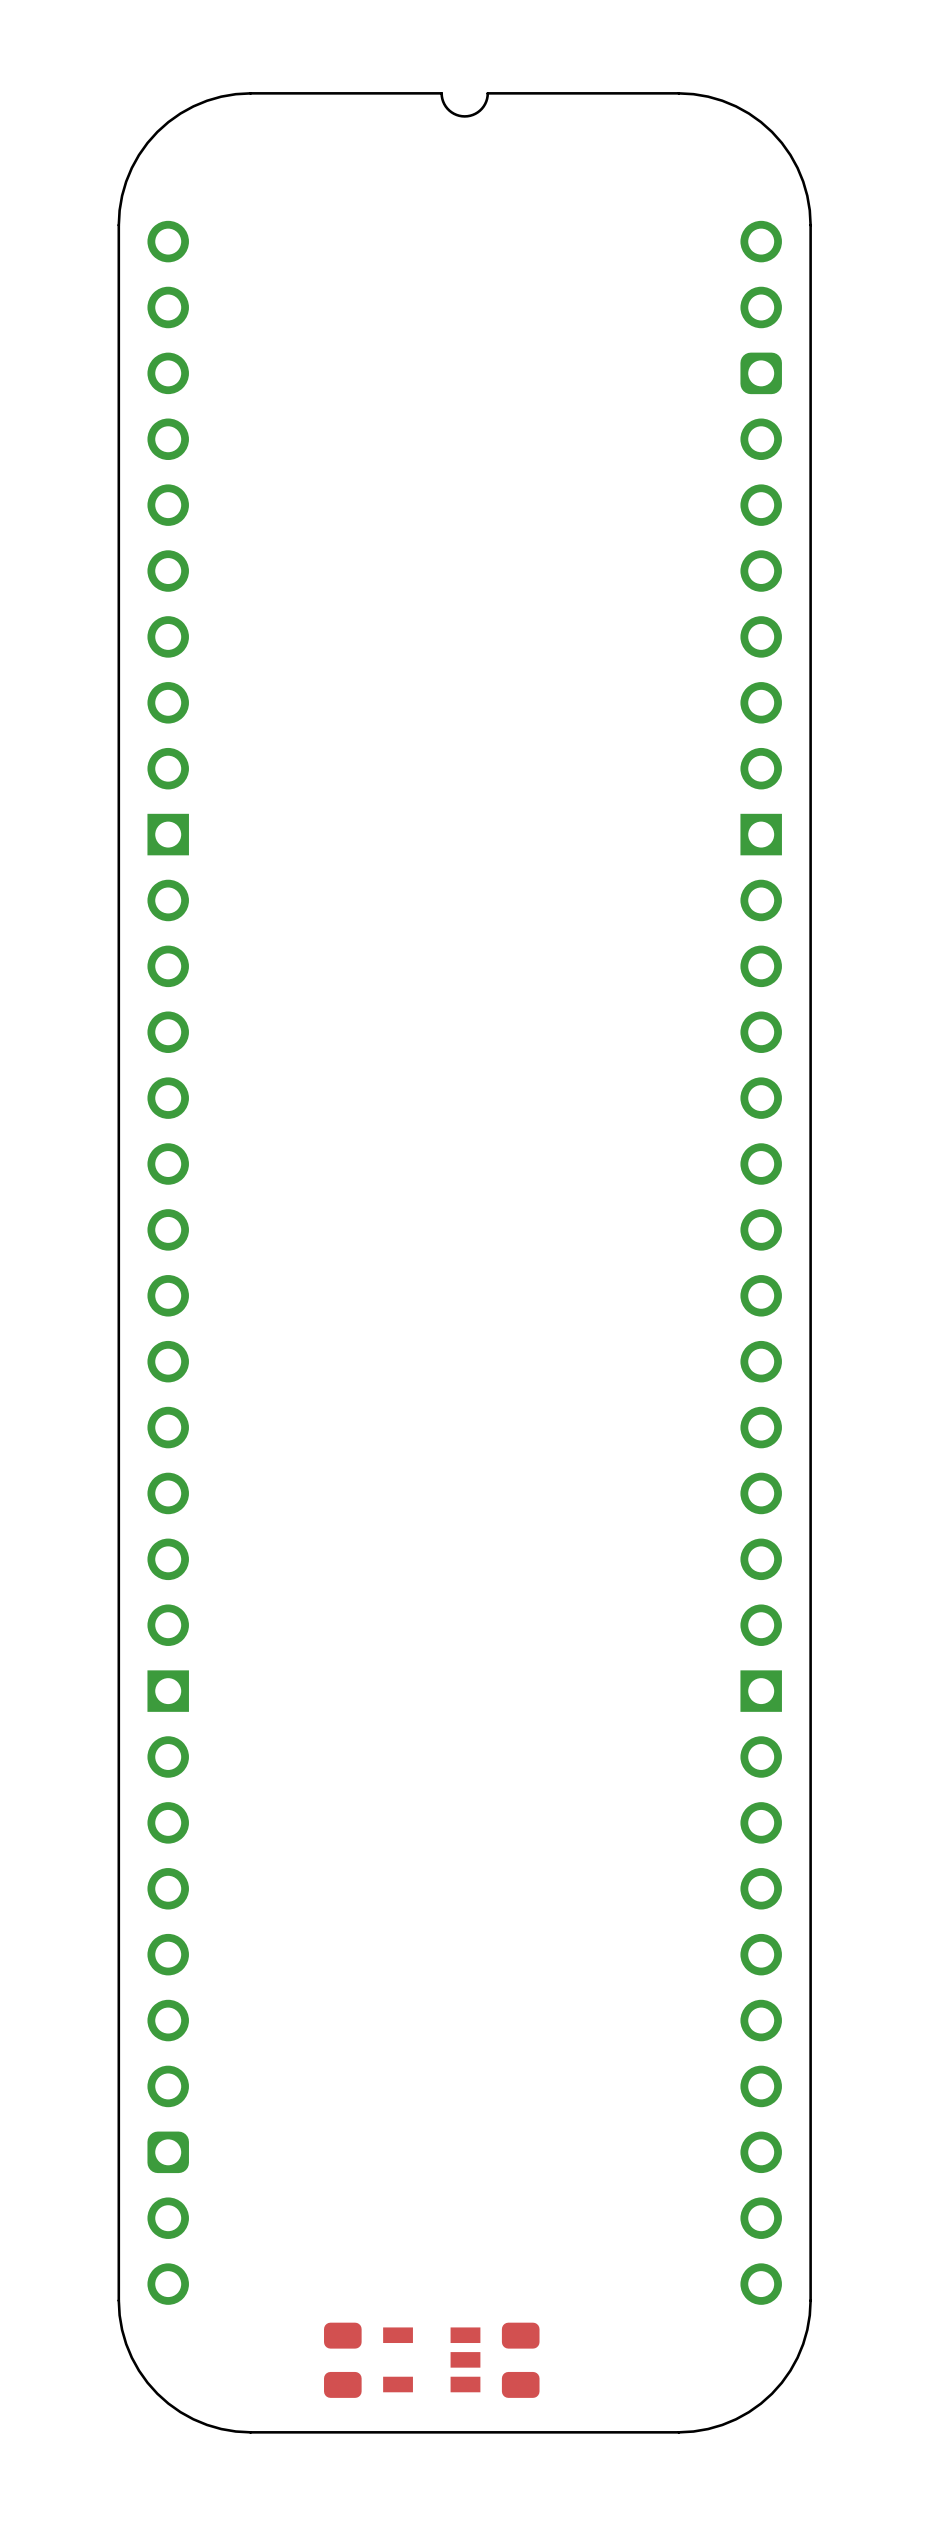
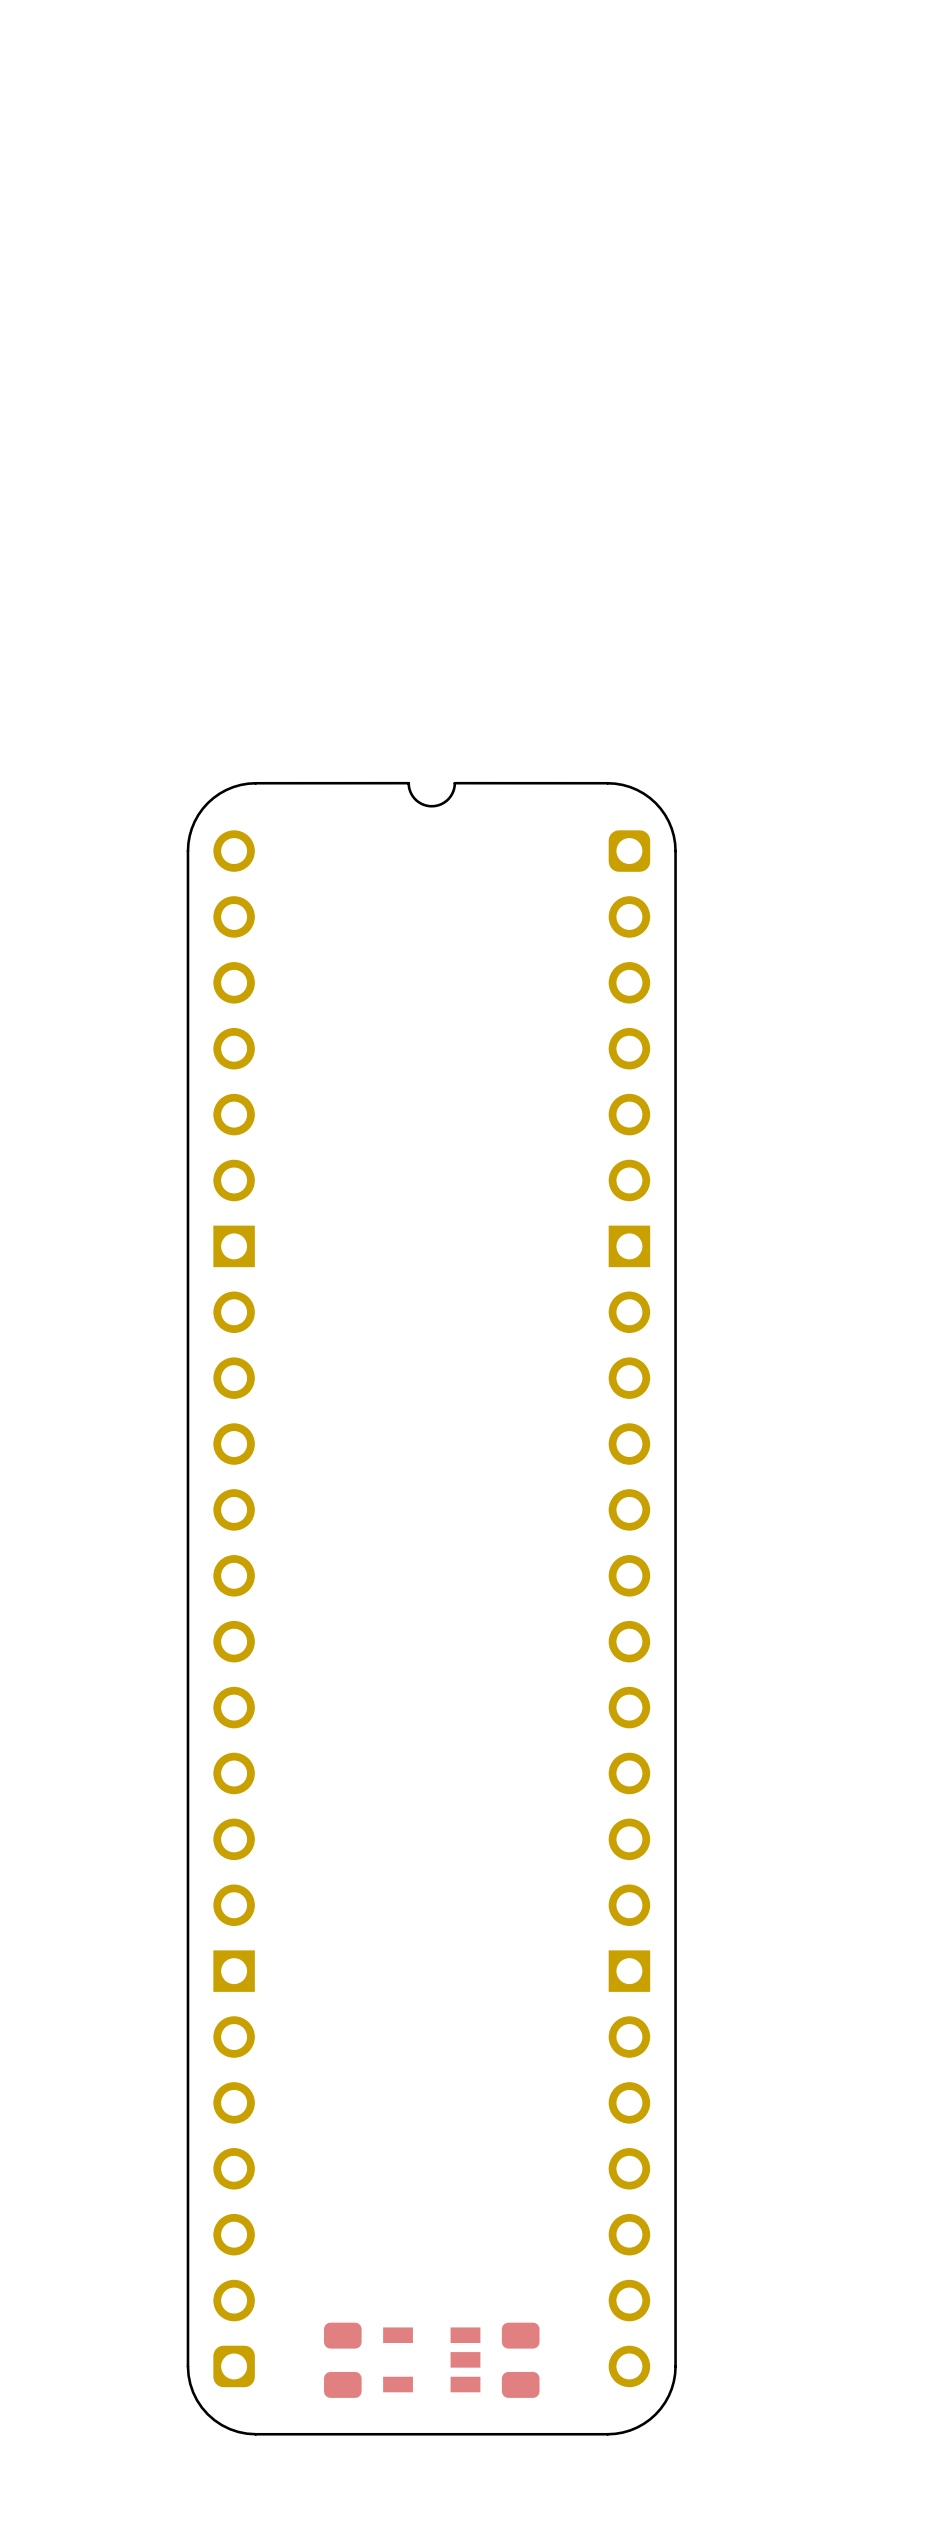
part: (464, 1262) -> none
part: none -> (431, 1608)

